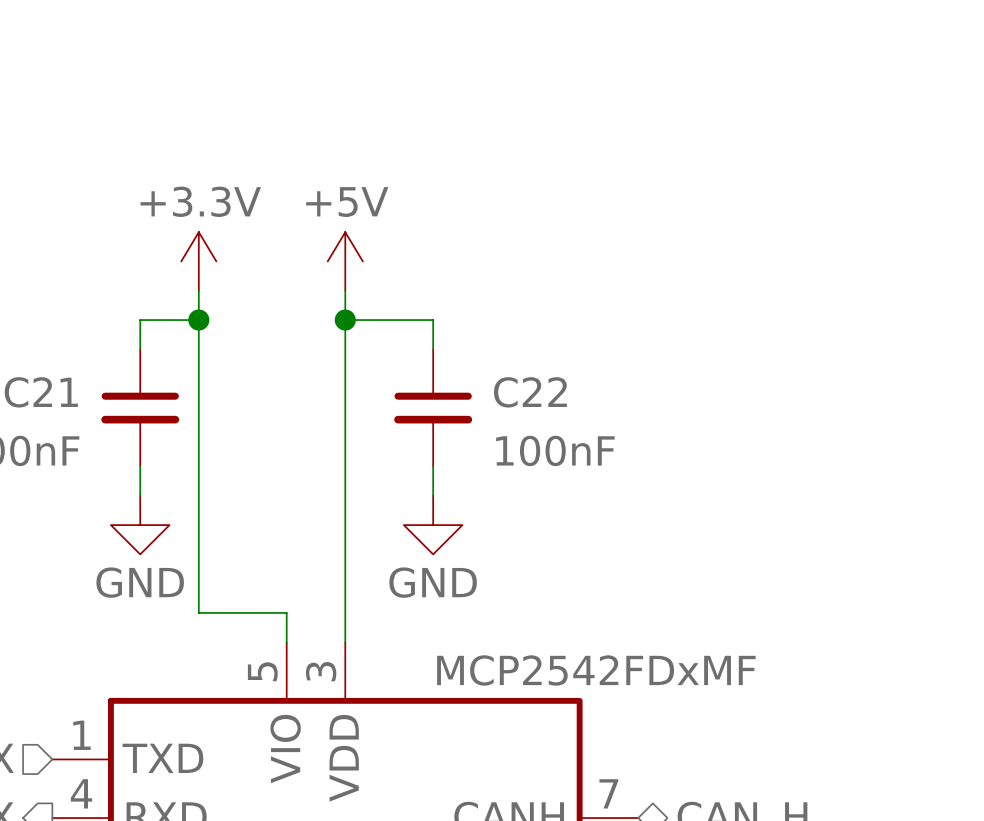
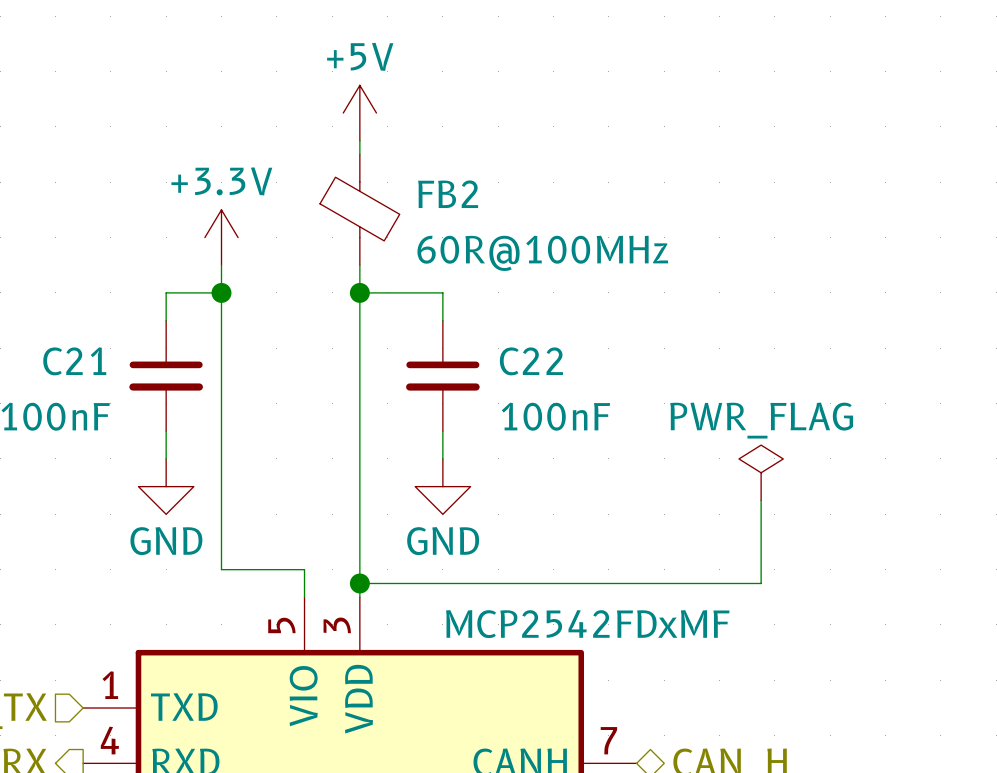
wire: none -> (359, 140) (359, 154)
FB2: none -> 60R@100MHz (359, 209)
power symbol position: +5V (345, 261) -> +5V (359, 113)
power symbol: none -> PWR_FLAG (761, 472)
wire: none -> (761, 500) (761, 583) (359, 583)
junction: none -> (359, 583)

